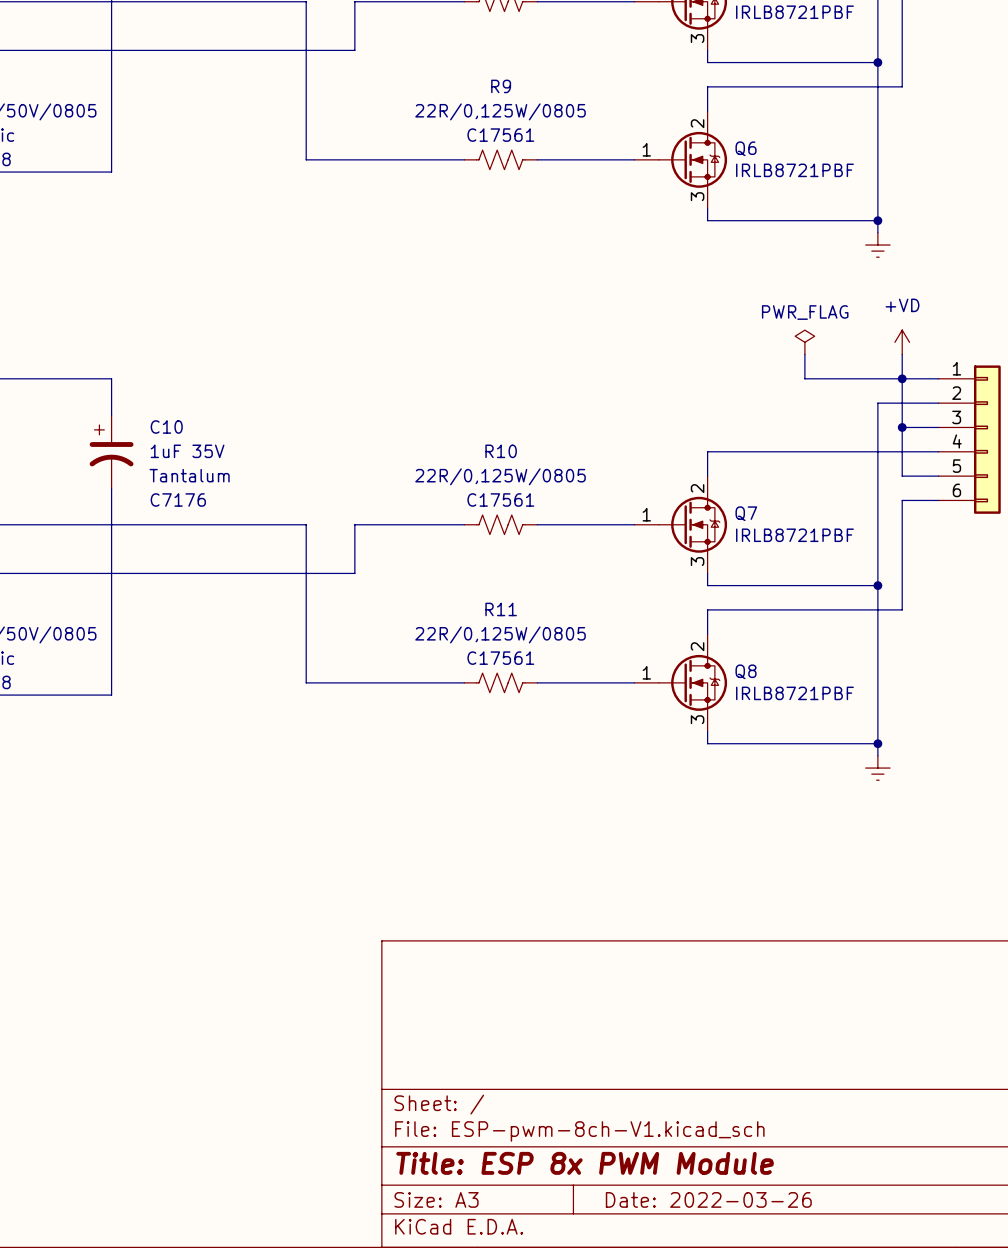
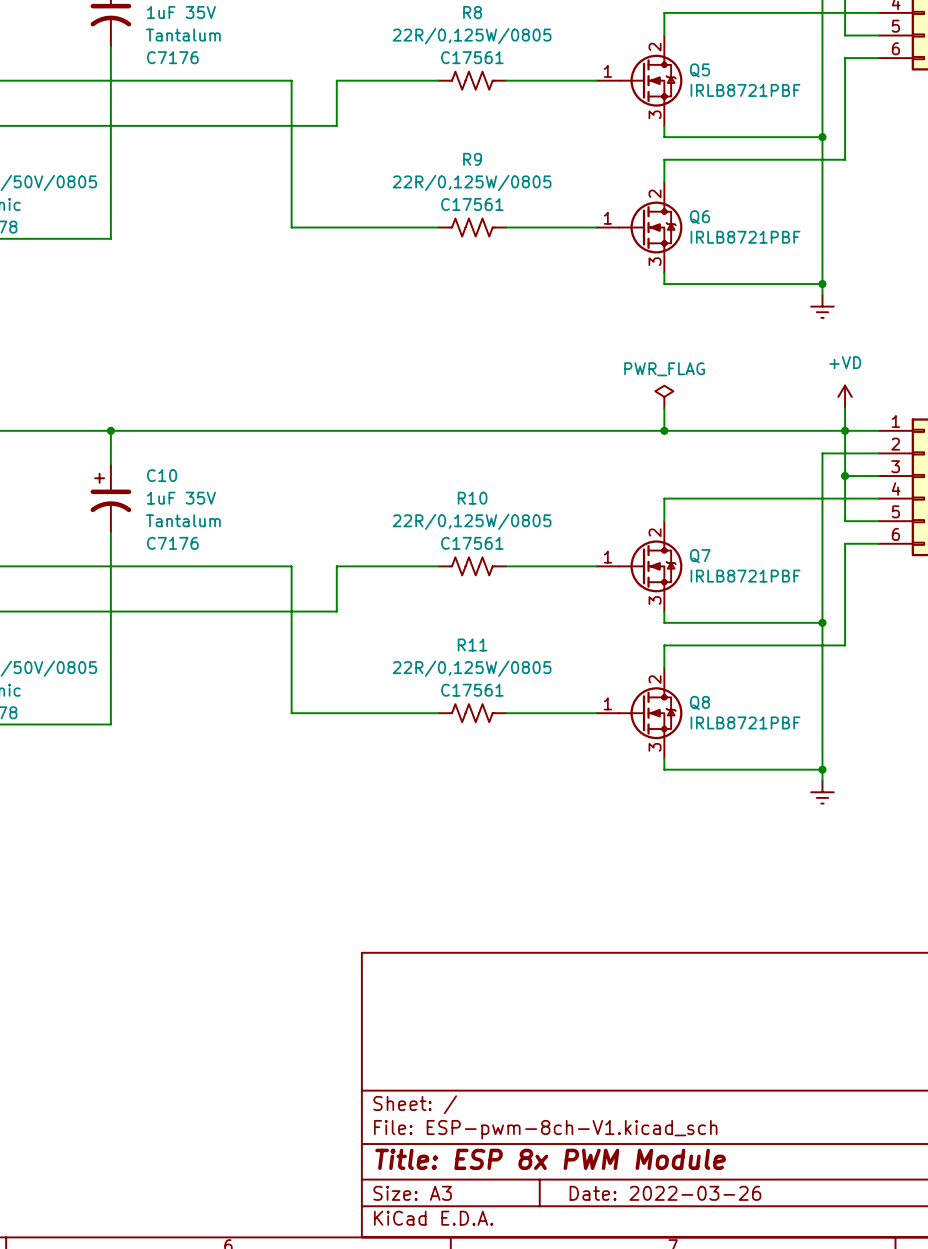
power symbol position: PWR_FLAG (804, 342) -> PWR_FLAG (664, 396)
wire: none -> (664, 408) (664, 430)
wire: (804, 354) (804, 378) -> (110, 430) (754, 430)
junction: none -> (110, 430)
junction: none -> (664, 430)

